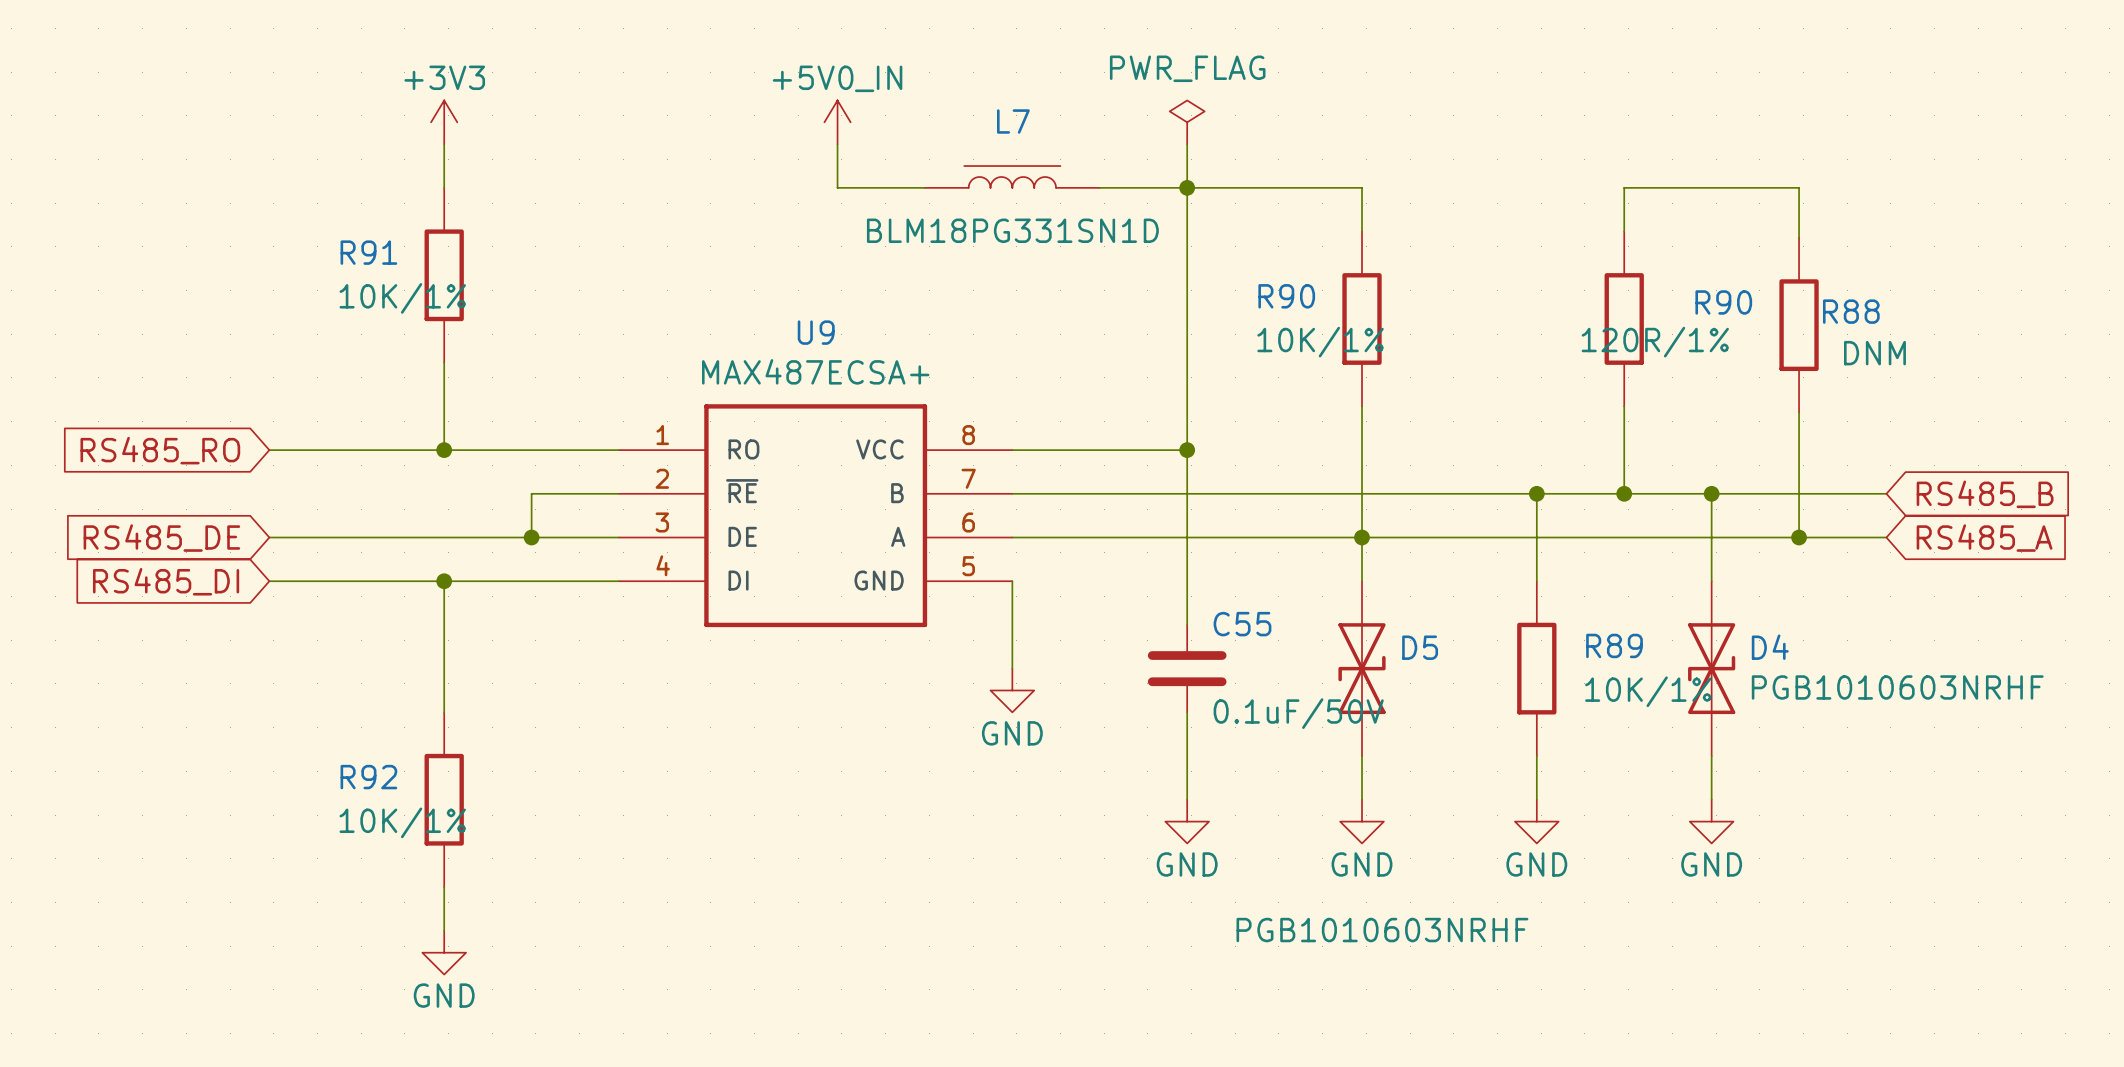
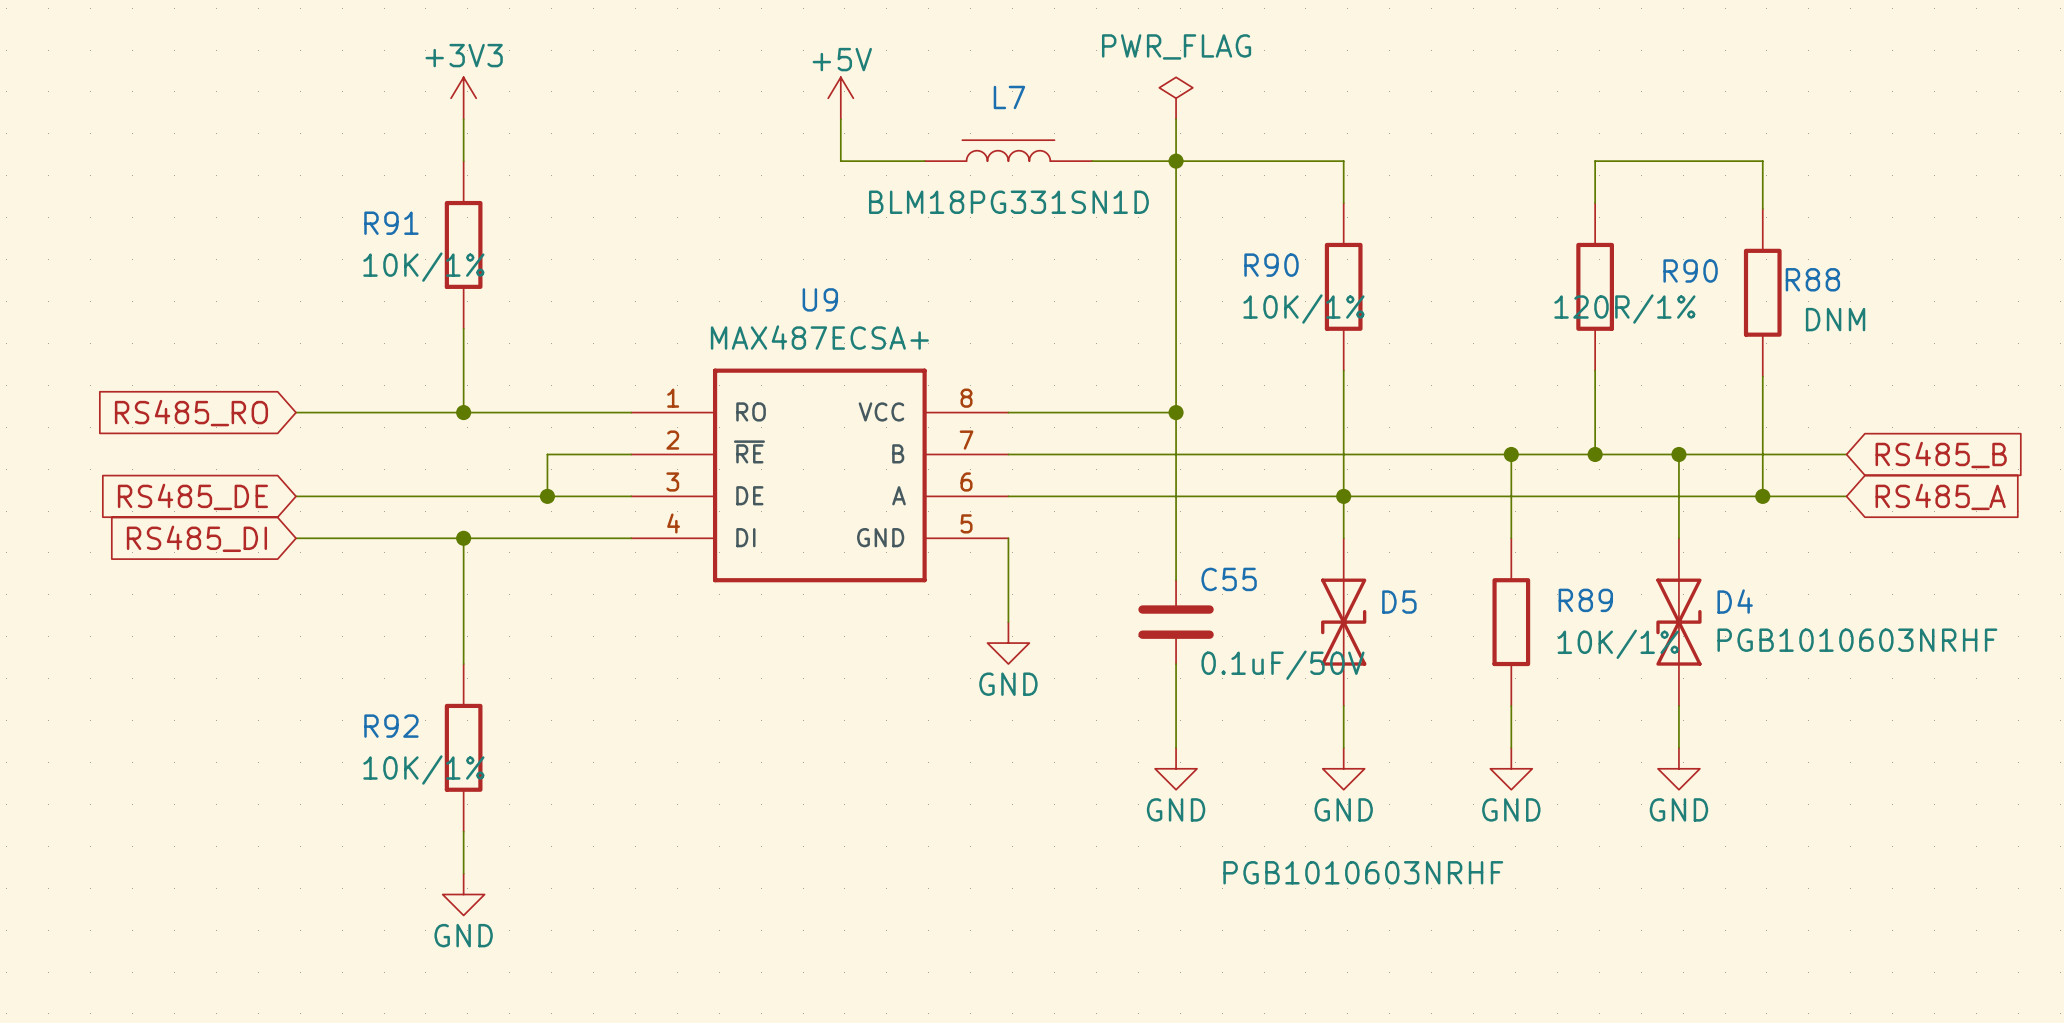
power symbol: +5V0_IN (837, 122) -> +5V (840, 98)

